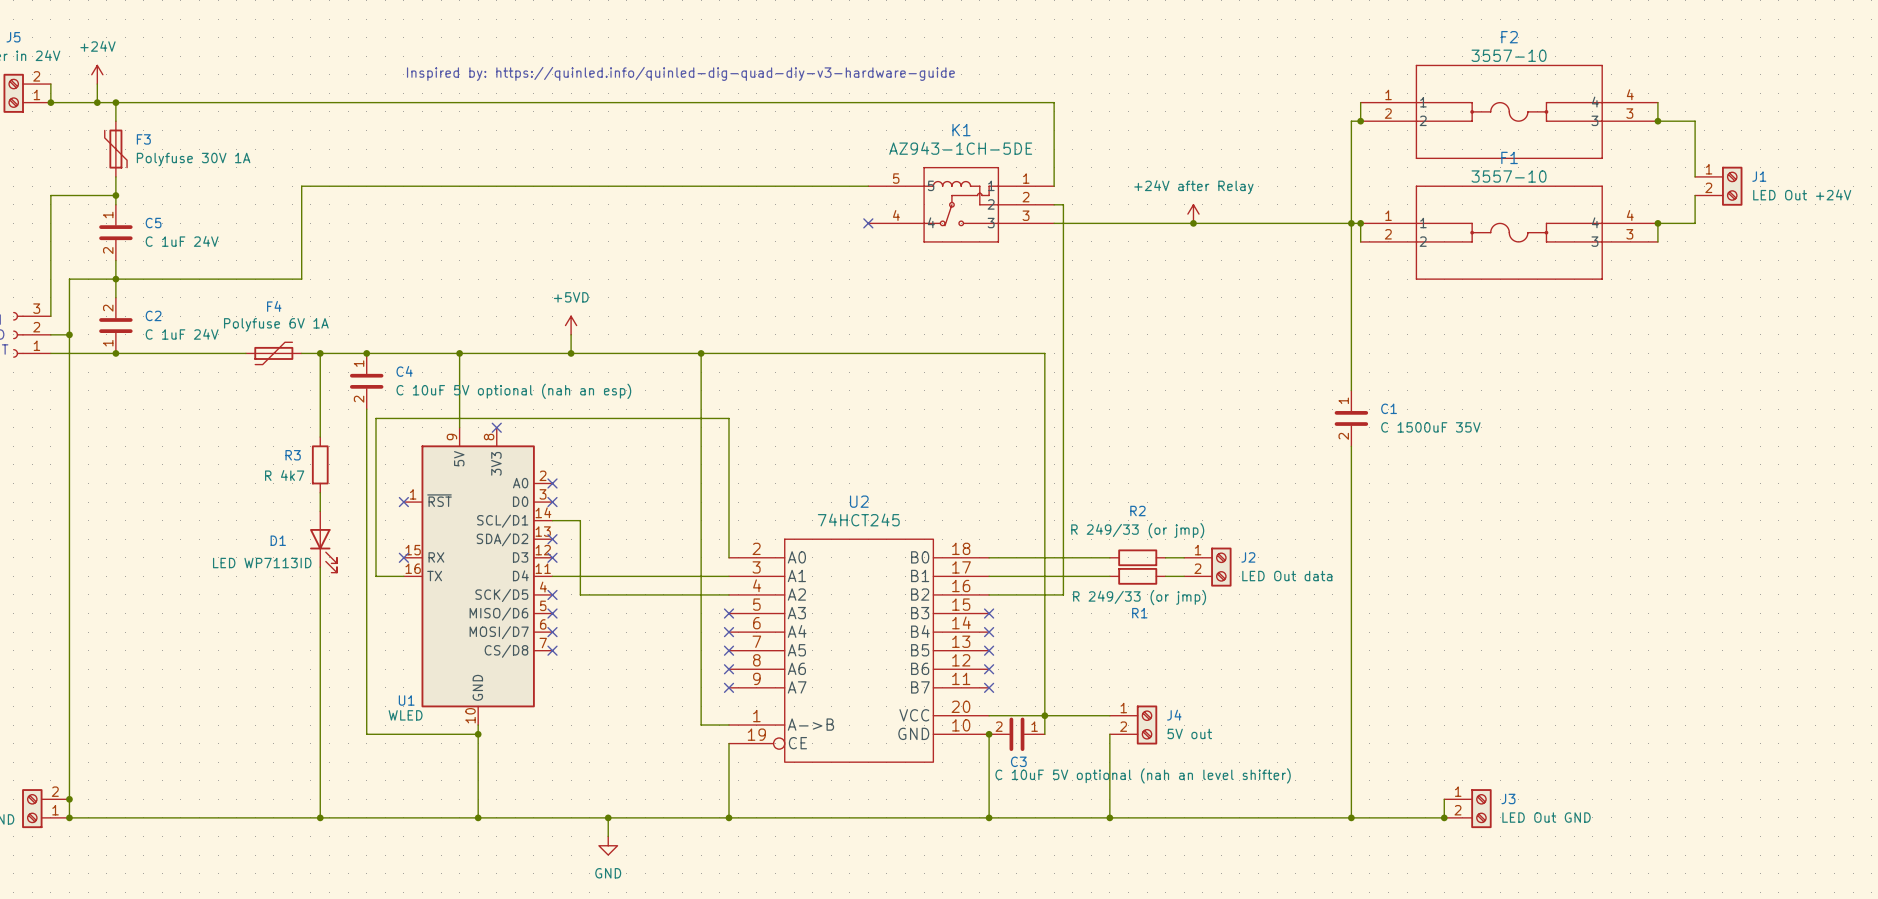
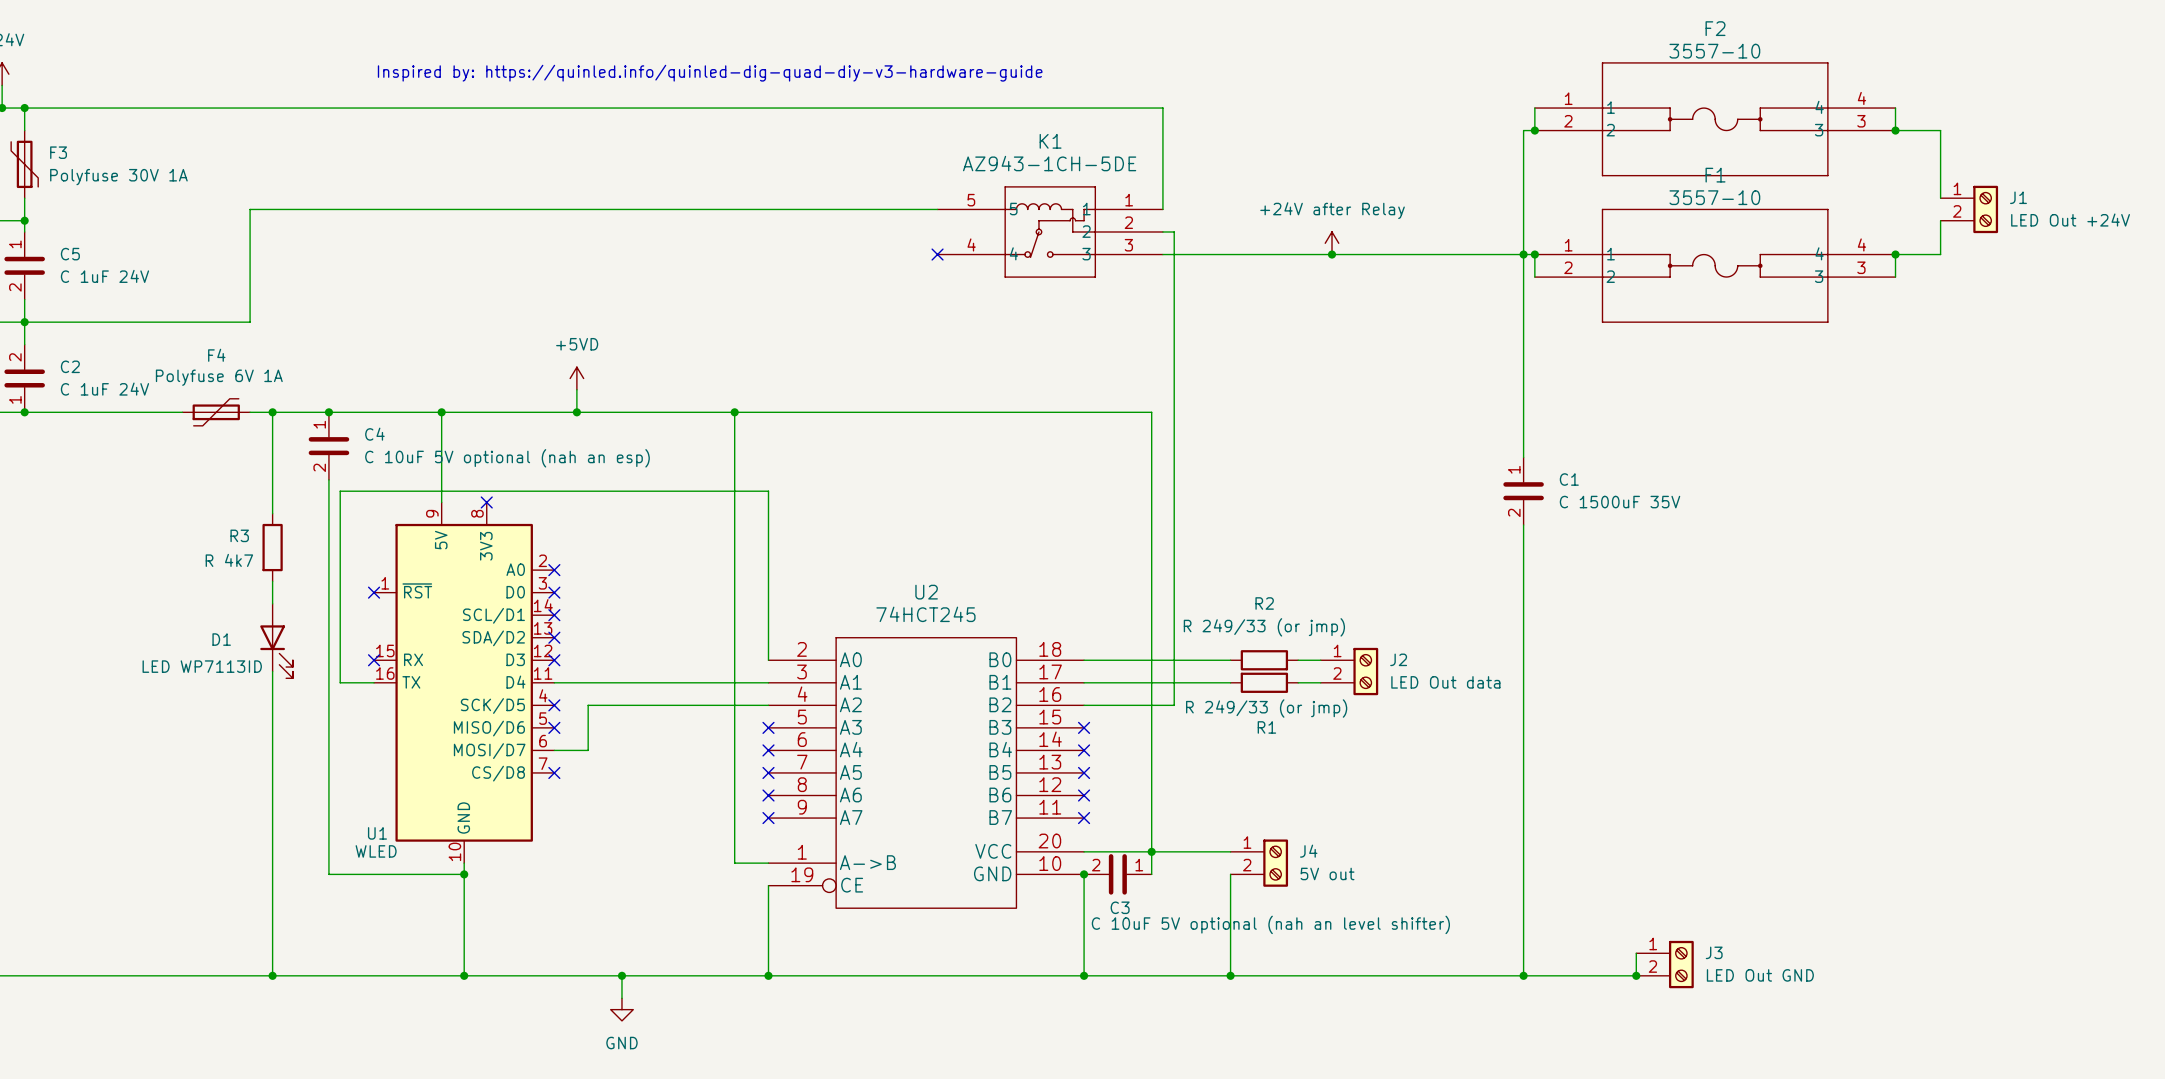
wire: (552, 520) (580, 520) (580, 594) -> (554, 750) (588, 750) (588, 705)
no-connect mark: none -> (554, 615)
no-connect mark: (552, 632) -> none

